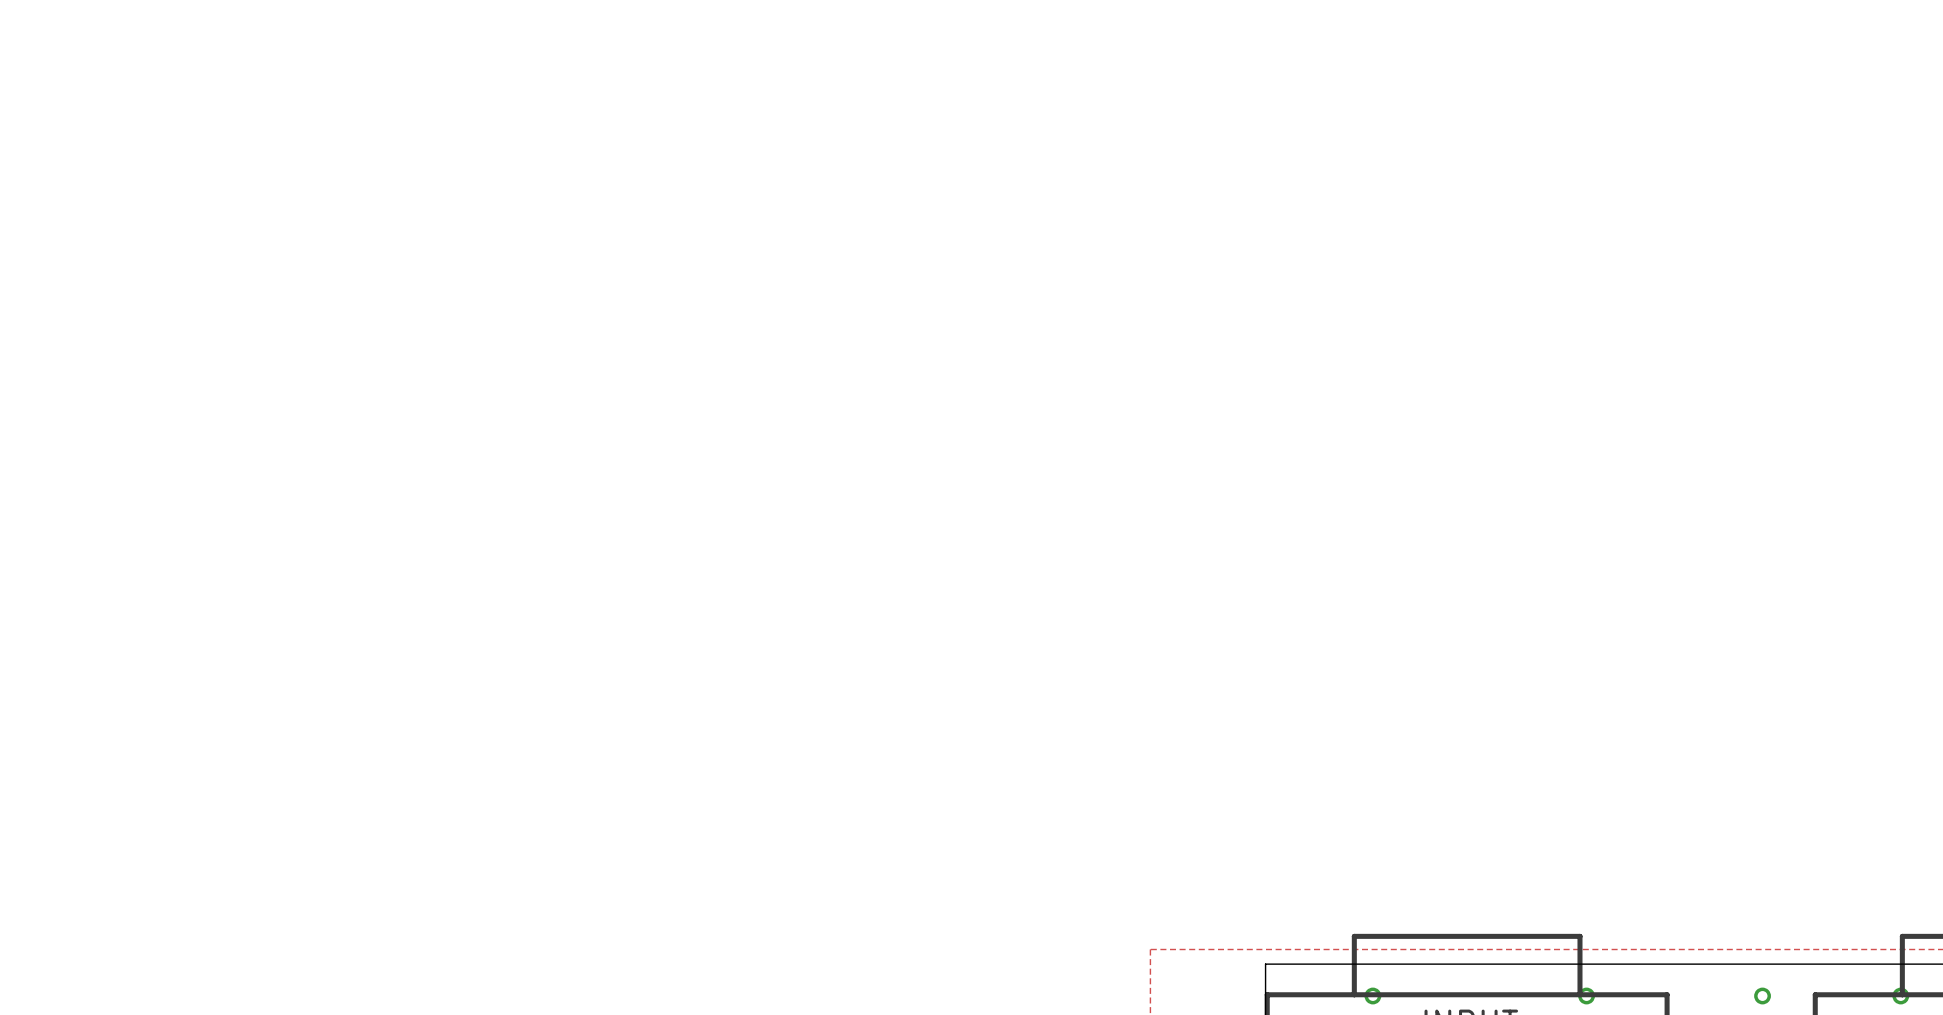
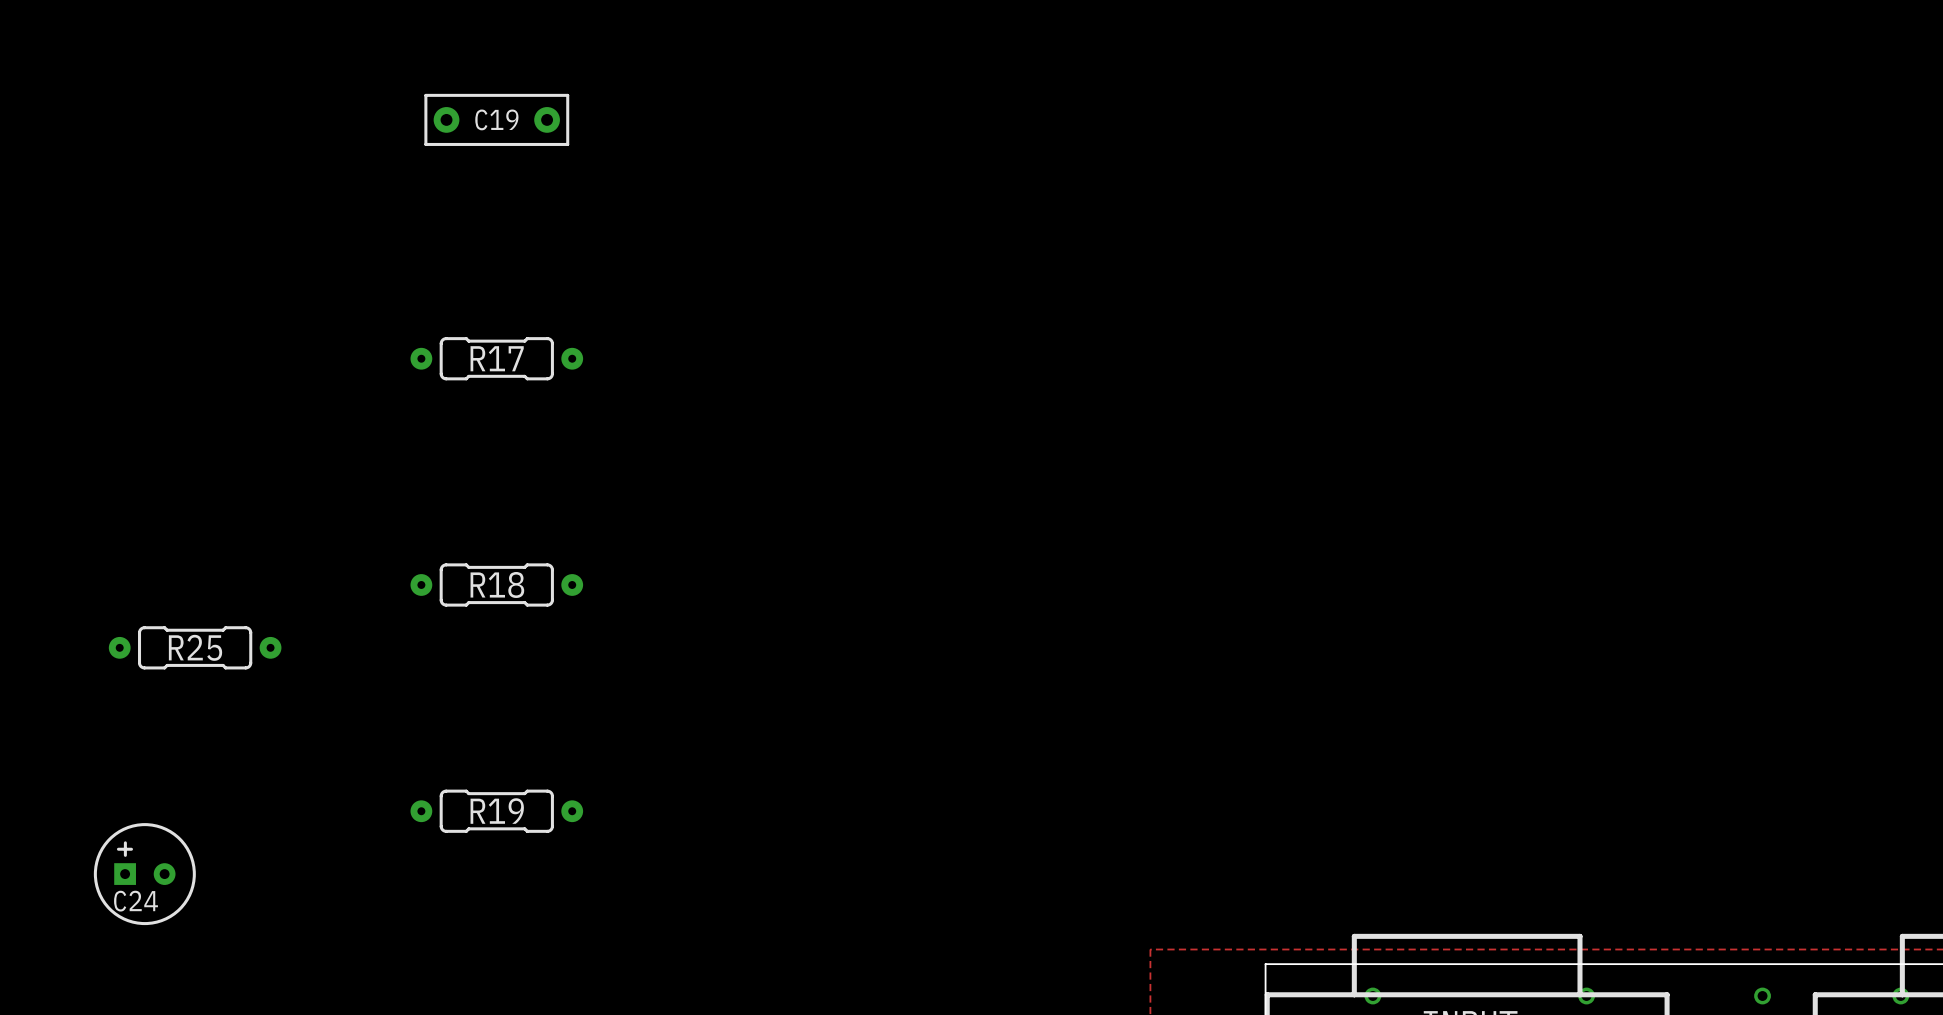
C19: none -> (496, 119)
R17: none -> (496, 358)
R18: none -> (496, 584)
R25: none -> (195, 647)
R19: none -> (496, 811)
C24: none -> (144, 874)

